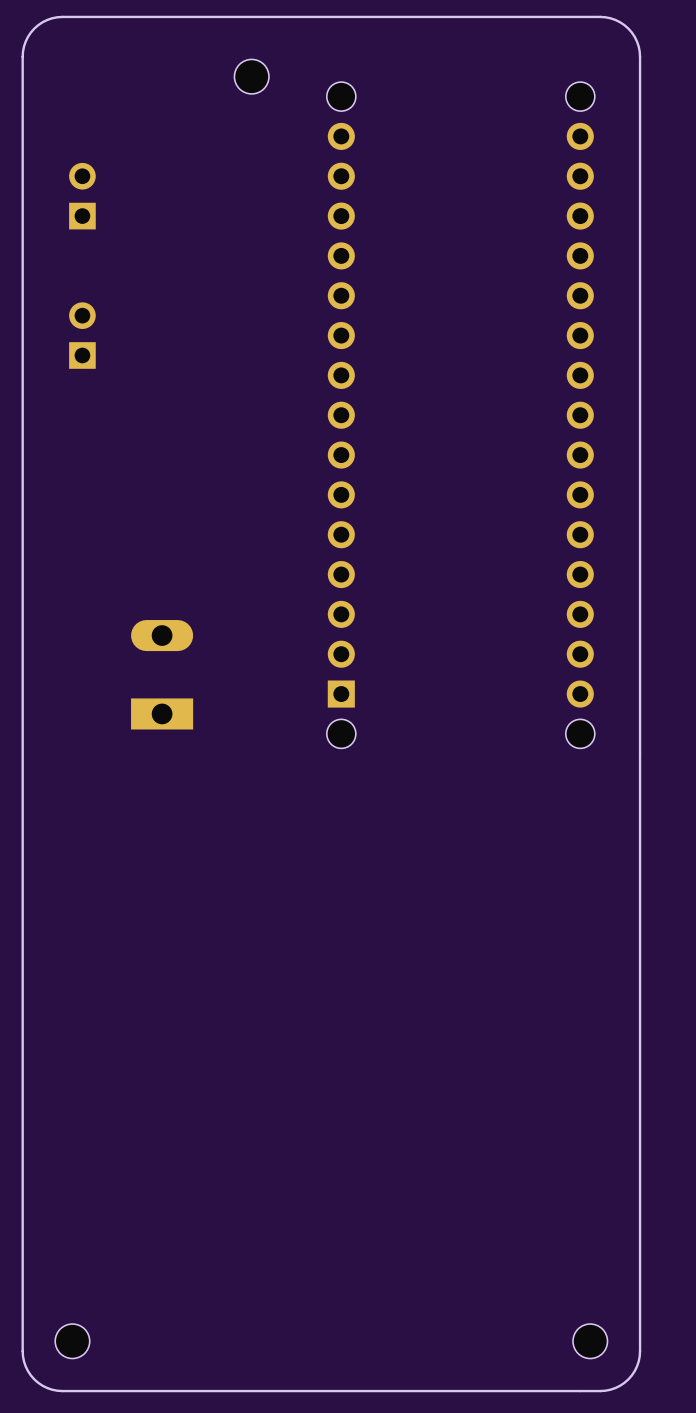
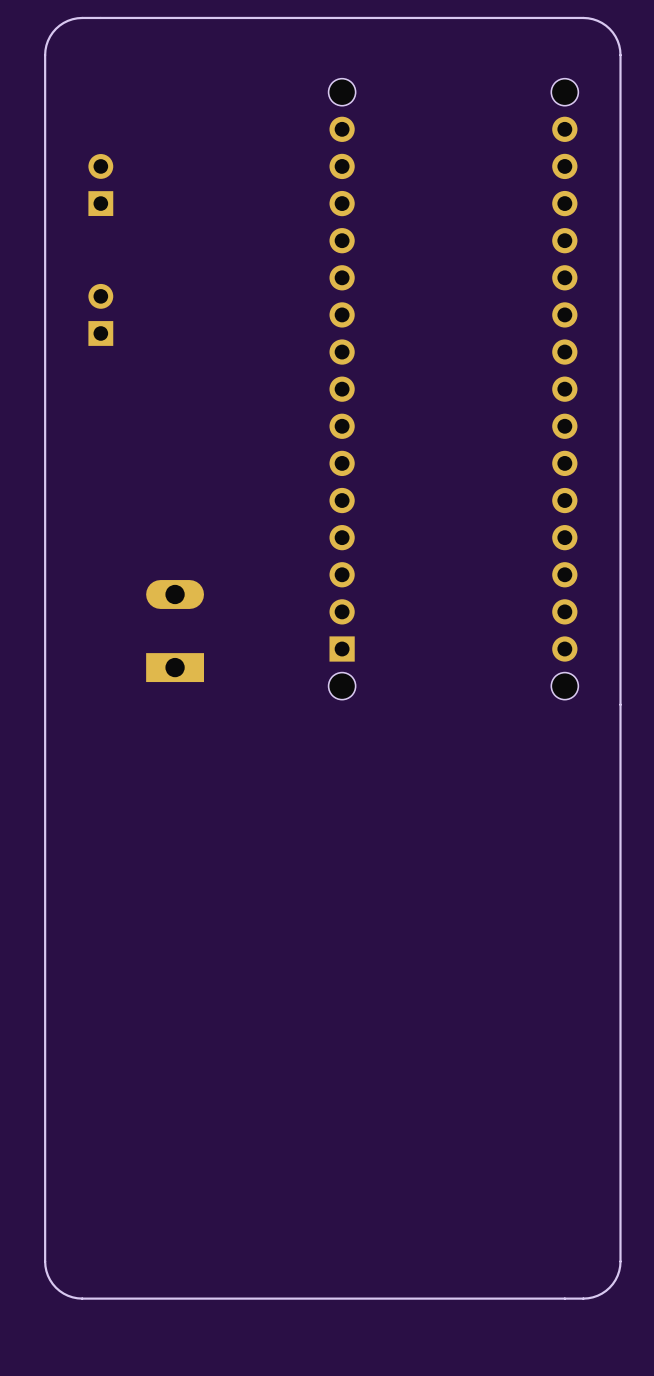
part: (251, 76) -> none
part: (72, 1341) -> none
part: (590, 1341) -> none

